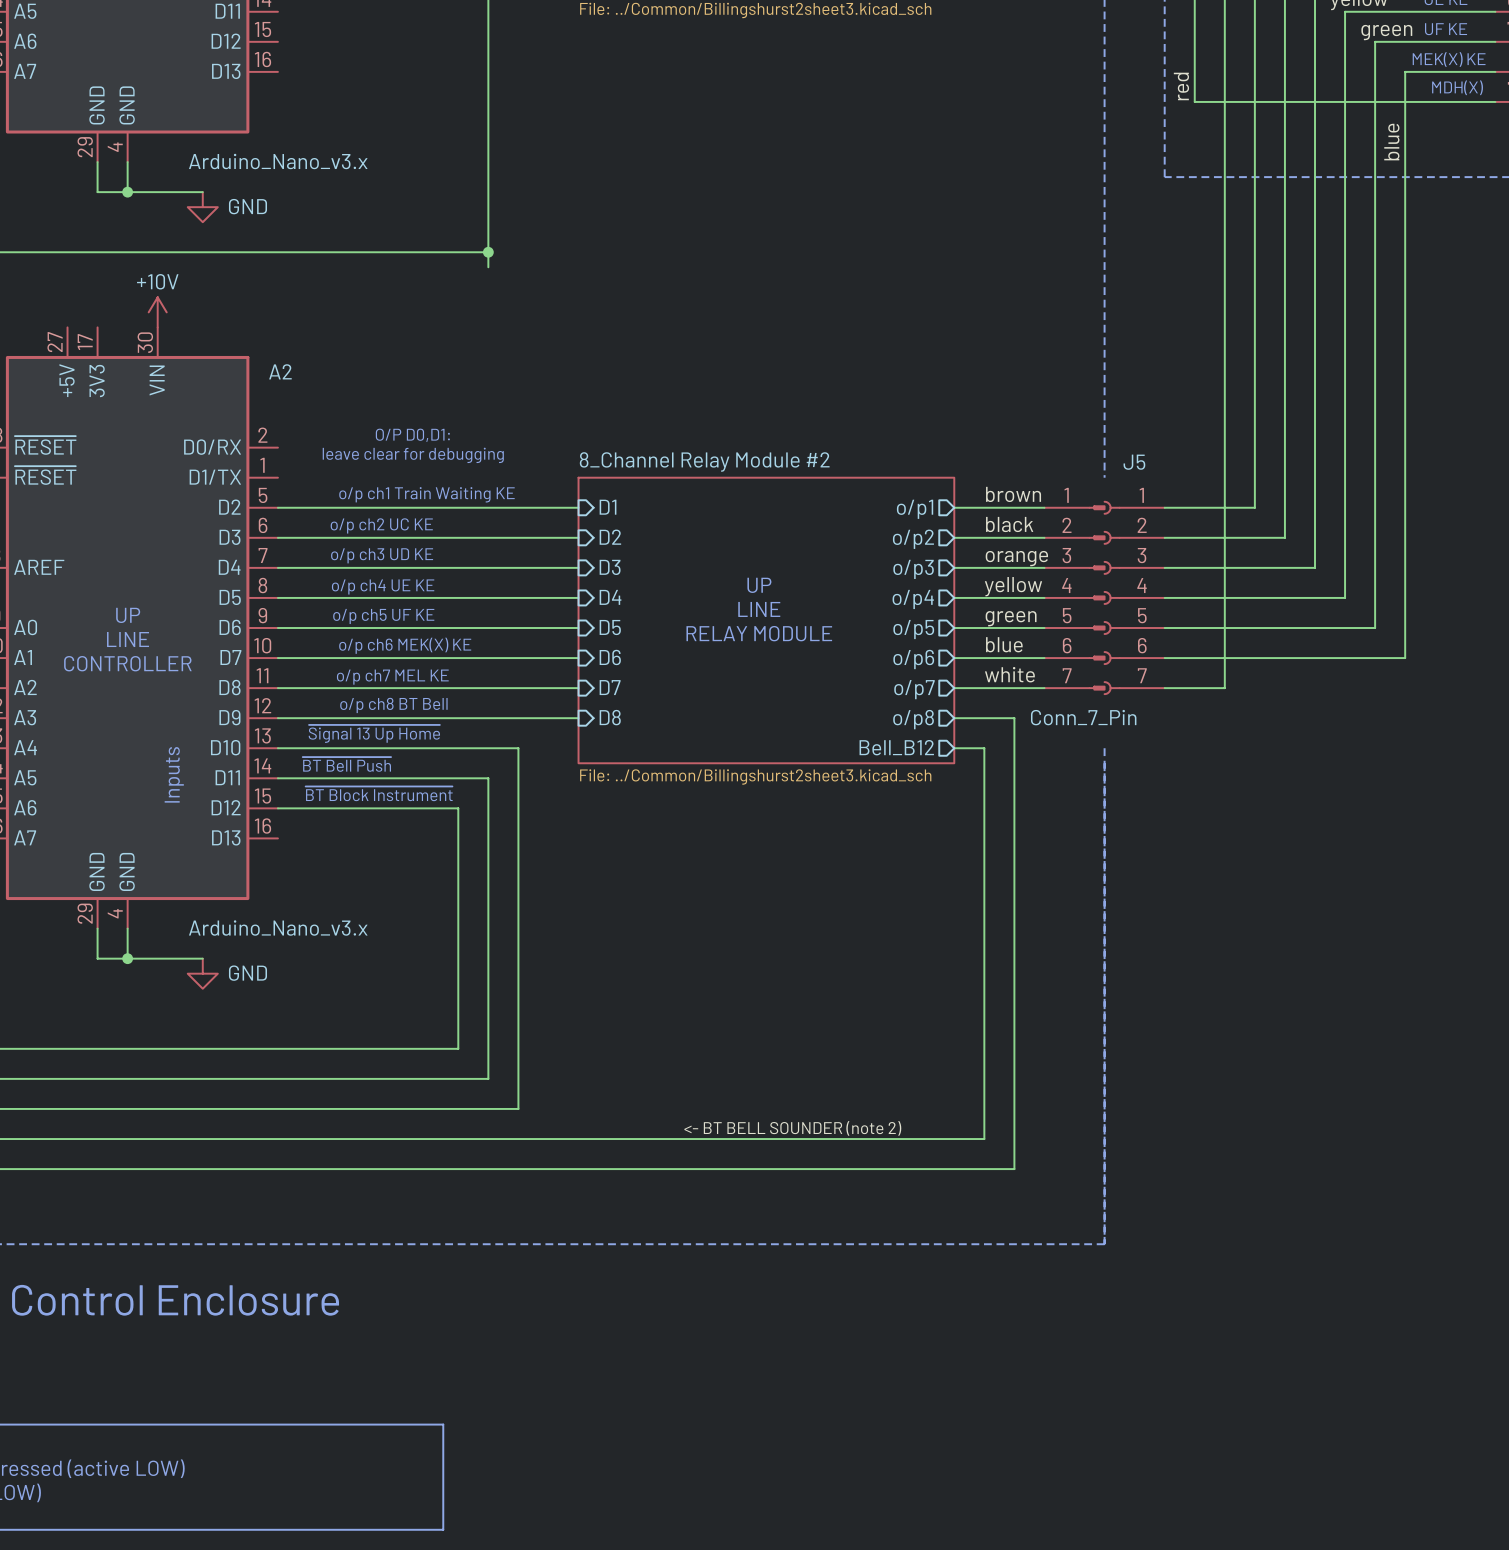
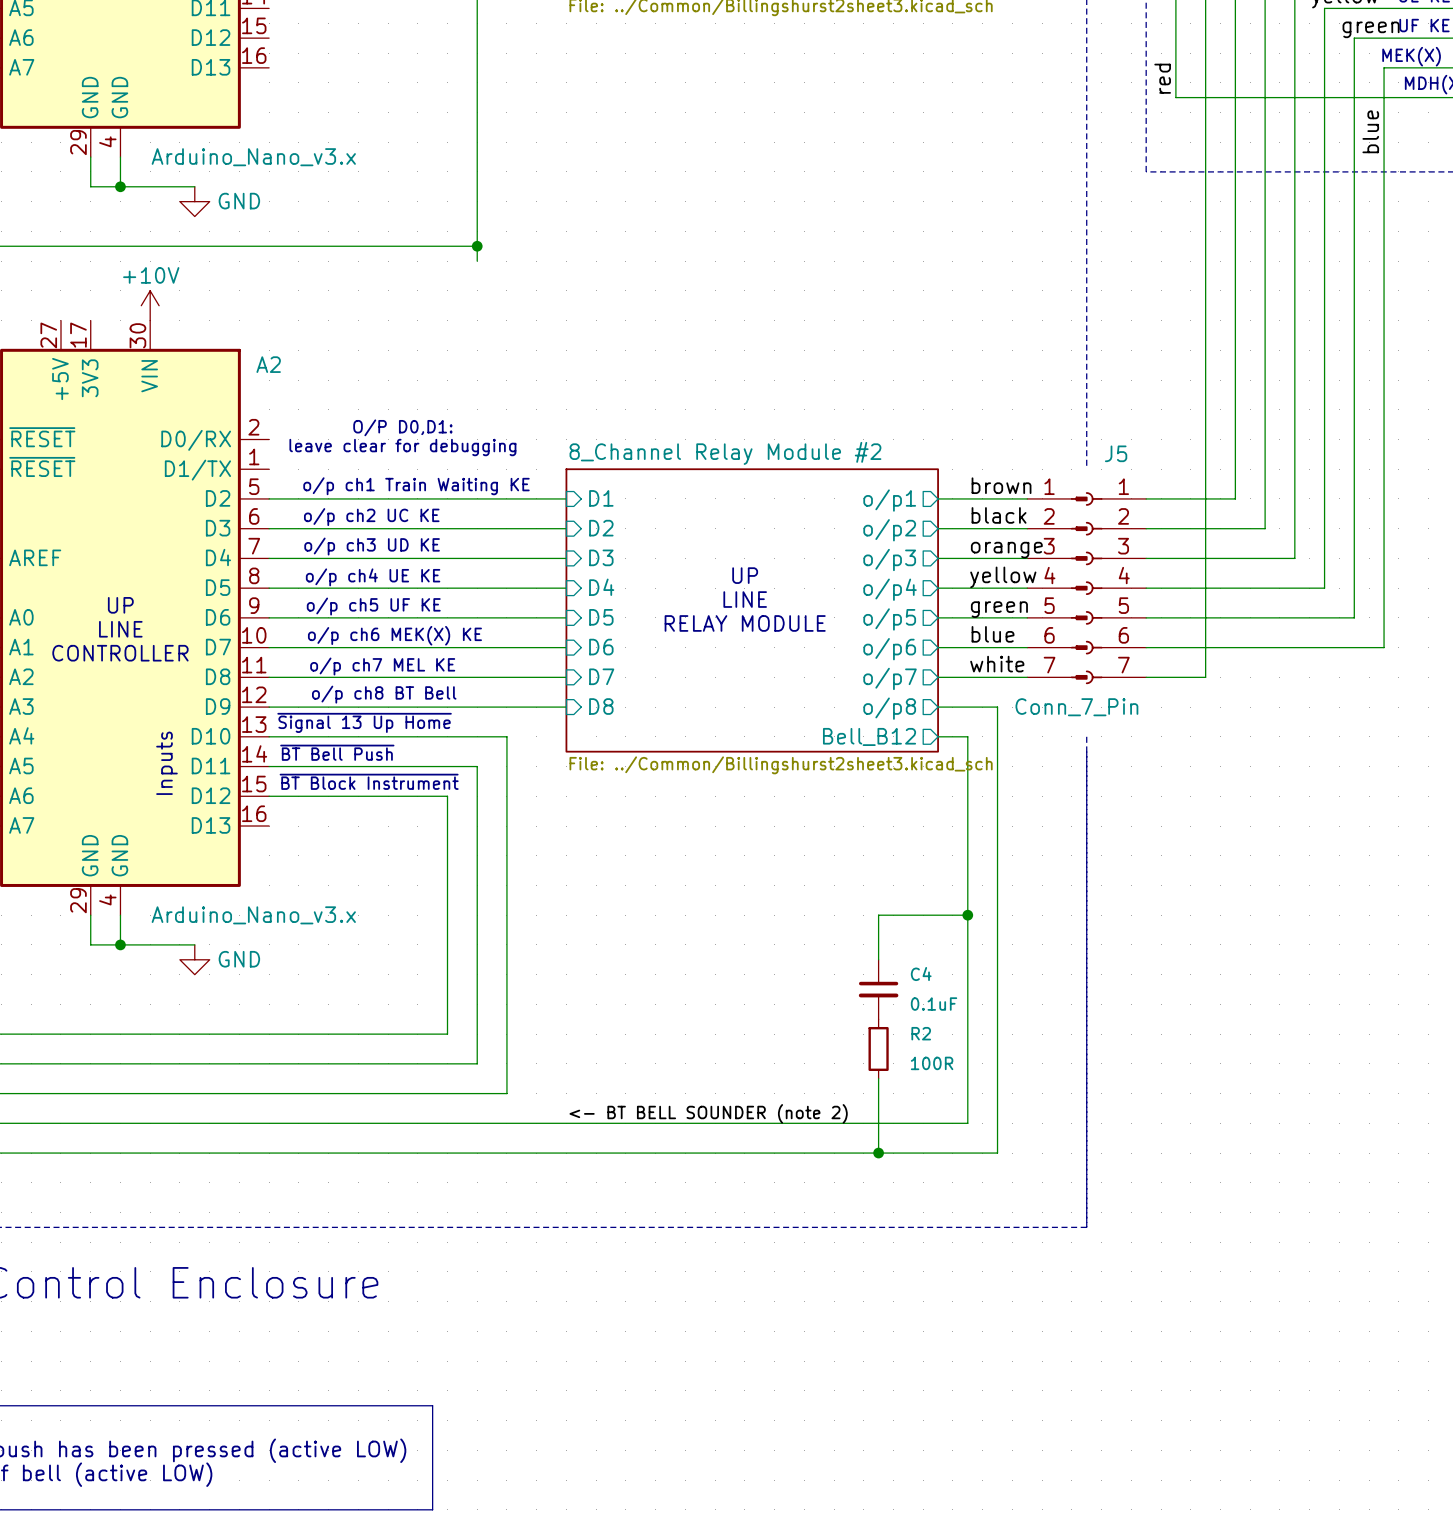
wire: none -> (967, 915) (878, 915) (878, 959)
junction: none -> (967, 915)
C4: none -> 0.1uF (878, 989)
R2: none -> 100R (878, 1048)
wire: none -> (878, 1078) (878, 1153)
label position: <- BT BELL SOUNDER (note 2) (792, 1128) -> <- BT BELL SOUNDER (note 2) (708, 1113)
junction: none -> (878, 1153)

